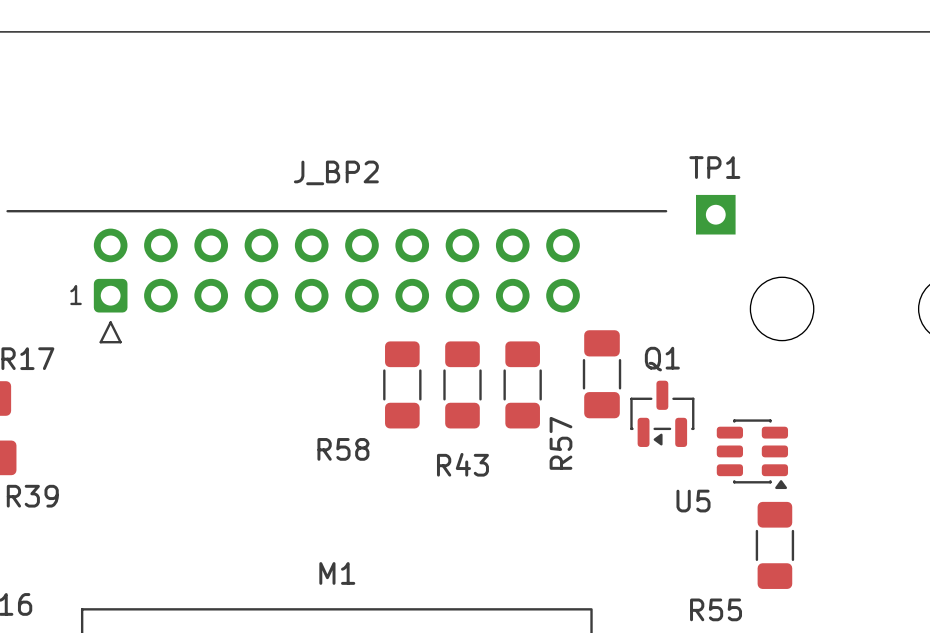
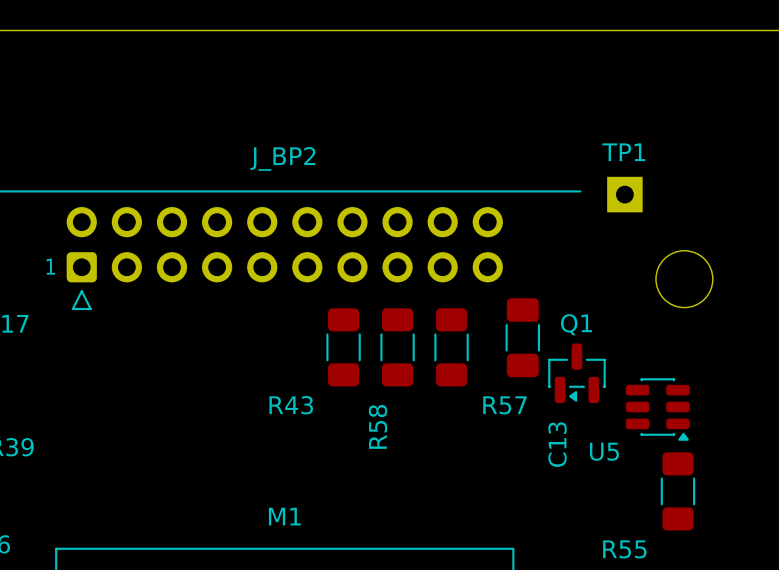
R57 name rotation: 0° (560, 443) -> 90° clockwise (504, 405)
R58 name rotation: 0° (343, 449) -> 90° counterclockwise (378, 426)
R58 name position: R58 (343, 449) -> R58 (378, 426)
R43 name position: R43 (462, 464) -> R43 (291, 405)
C13 name: none -> C13 (557, 444)

